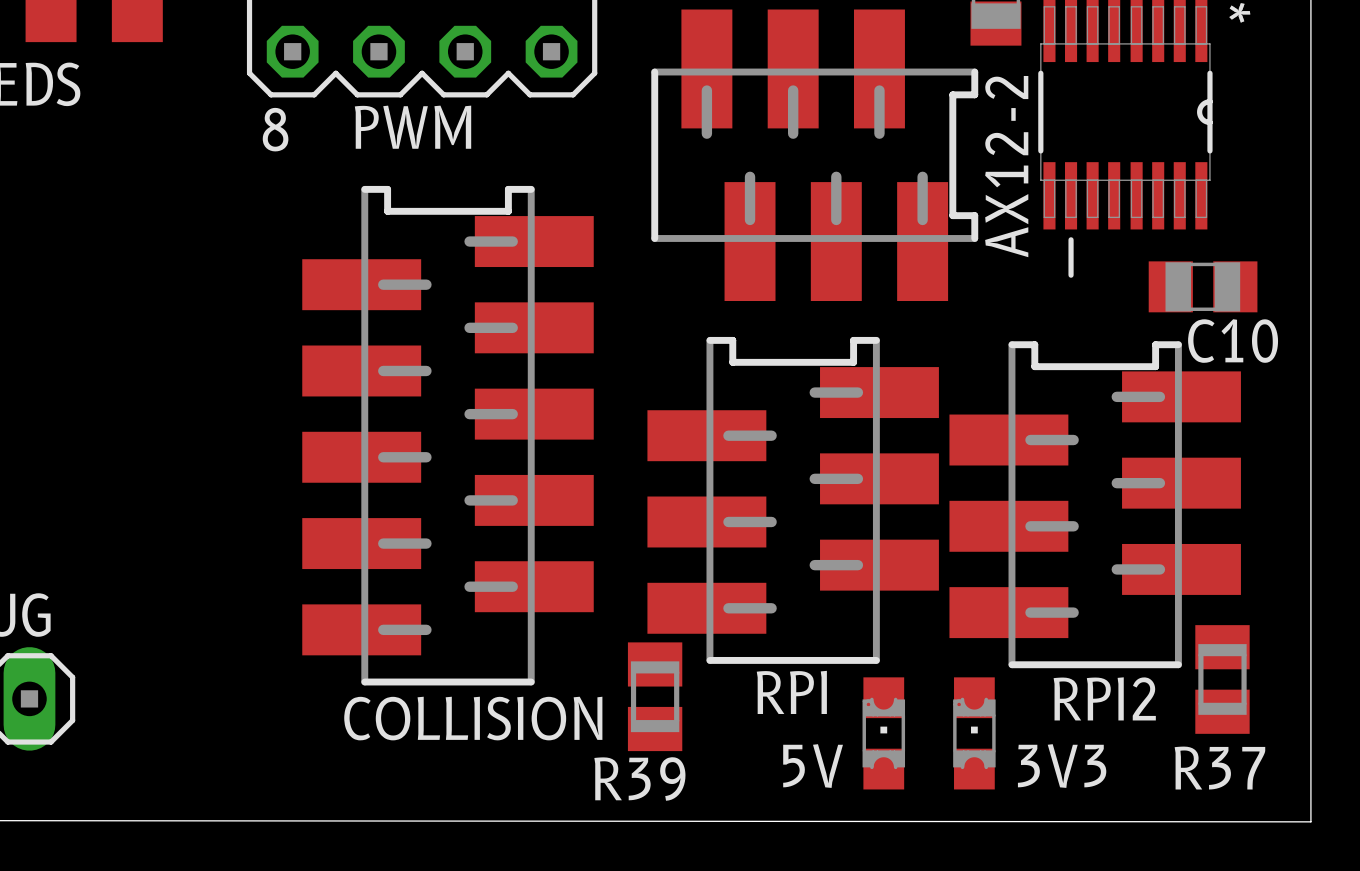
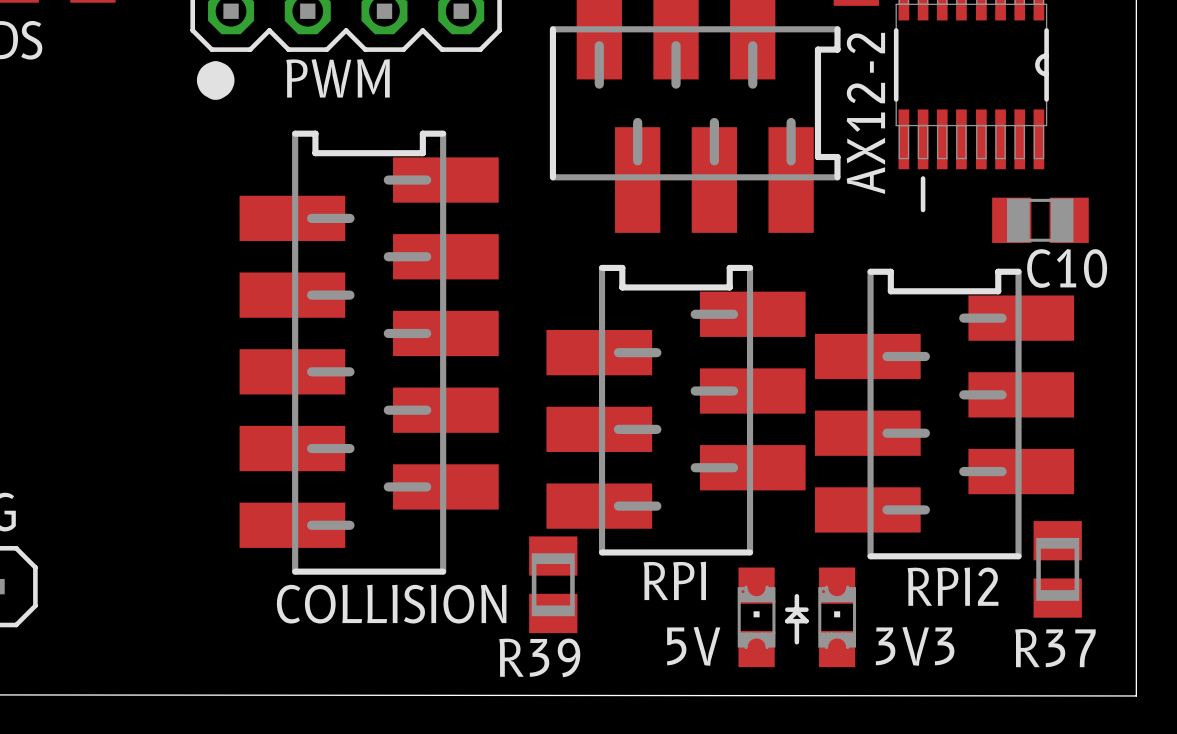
drawing: none -> [196, 61, 235, 100]
line: none -> (796, 596) (796, 611)
line: none -> (787, 609) (806, 609)
line: none -> (796, 611) (806, 621) (787, 621) (796, 611)
line: none -> (796, 621) (796, 642)

